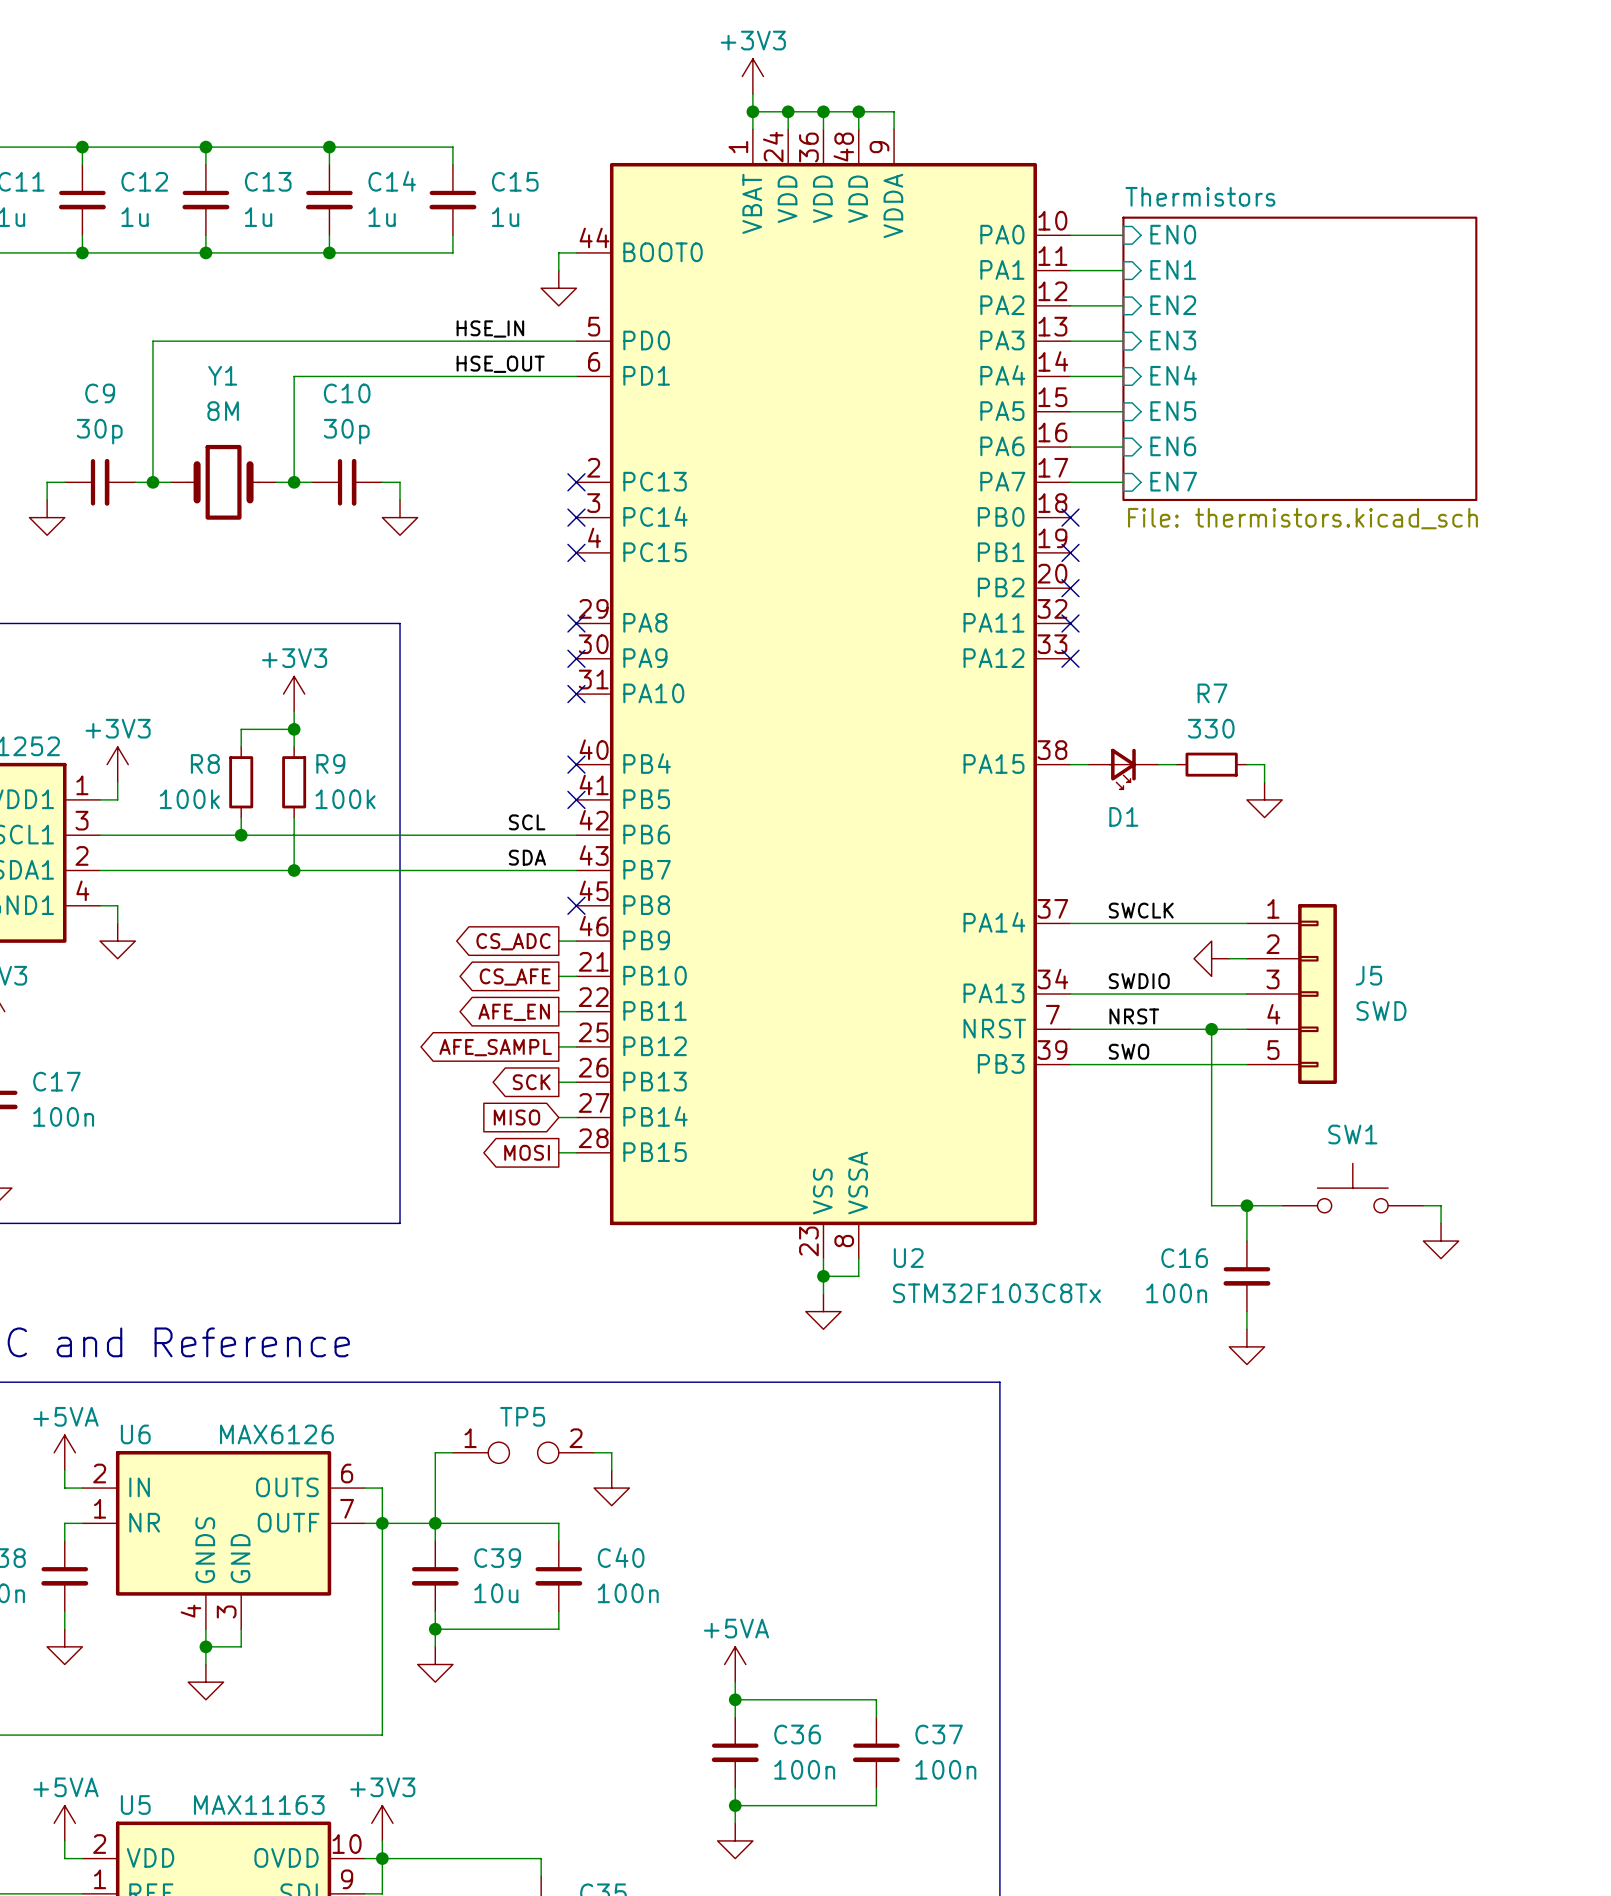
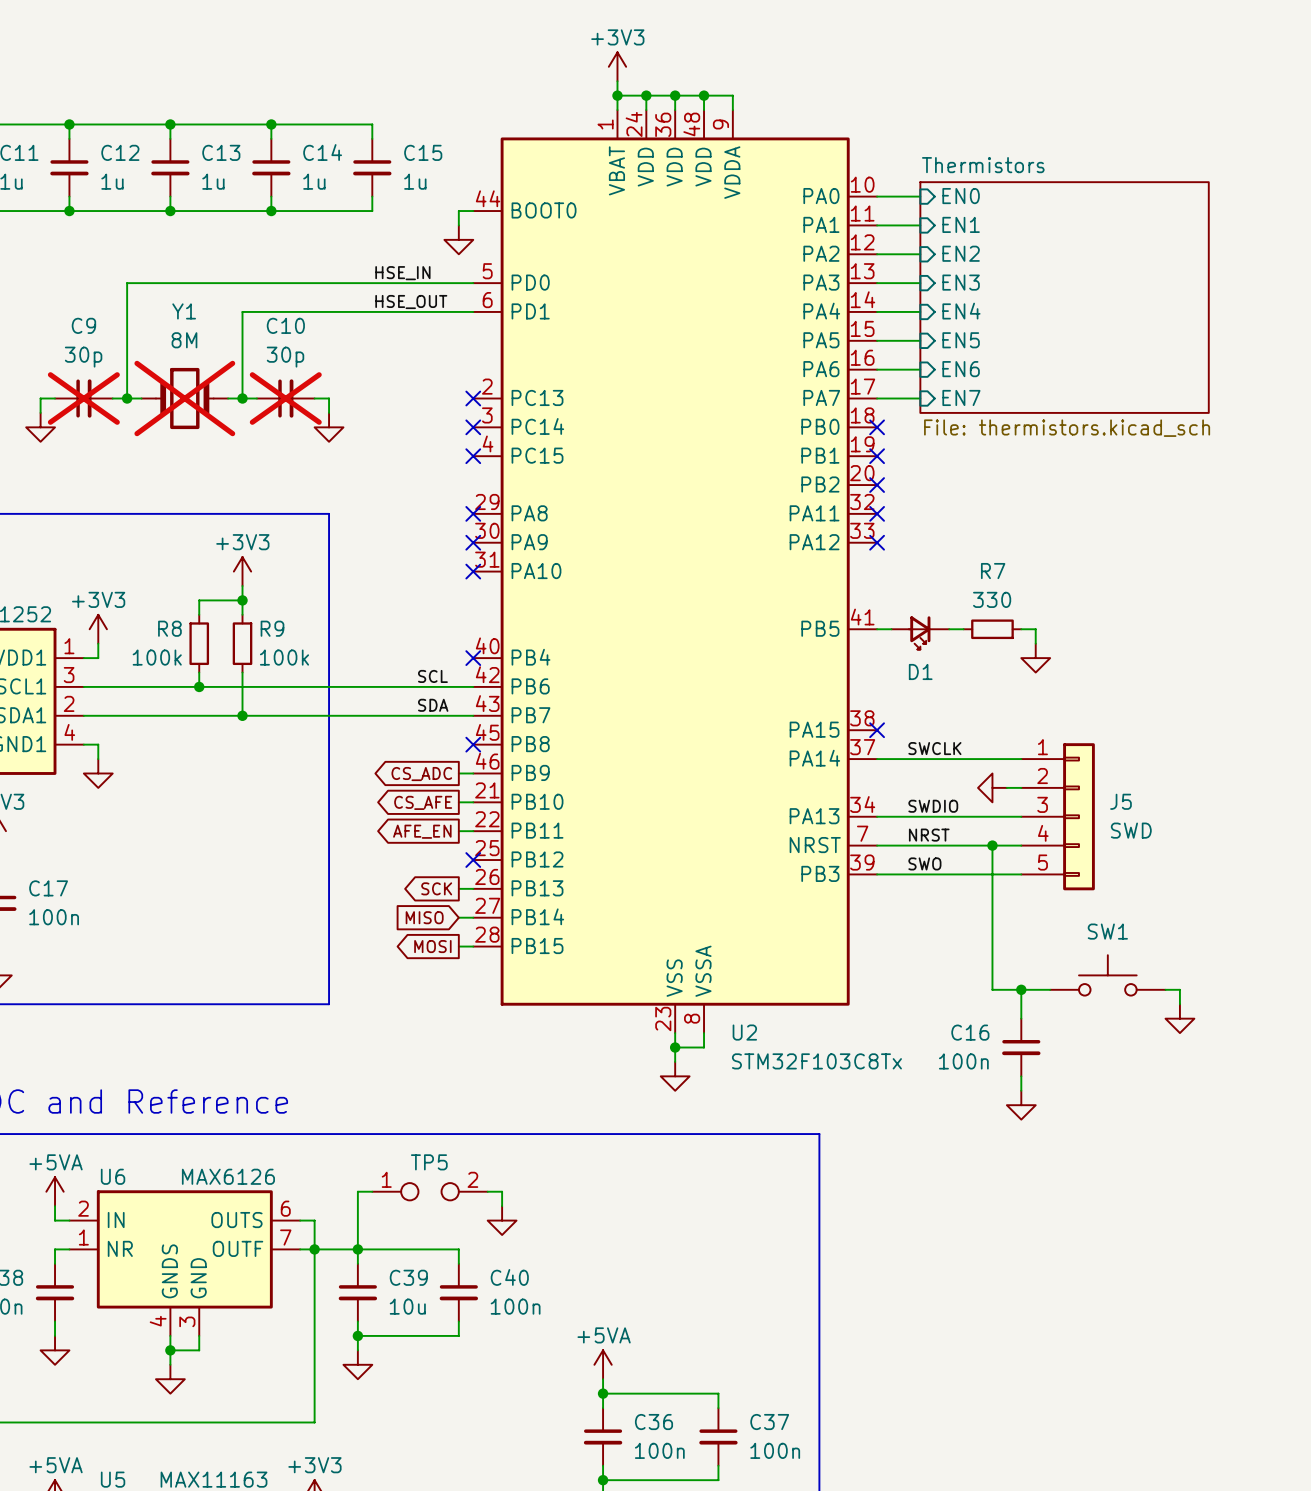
U2 symbol: [576, 129, 1071, 1259] -> [473, 110, 878, 1034]
C9 do-not-place cross: none -> (83, 398)
Y1 do-not-place cross: none -> (184, 398)
C10 do-not-place cross: none -> (285, 398)
no-connect mark: (576, 764) -> none
no-connect mark: none -> (877, 730)
wire: (558, 1046) (576, 1046) -> none
no-connect mark: none -> (473, 860)
global label: AFE_SAMPL (495, 1047) -> none

